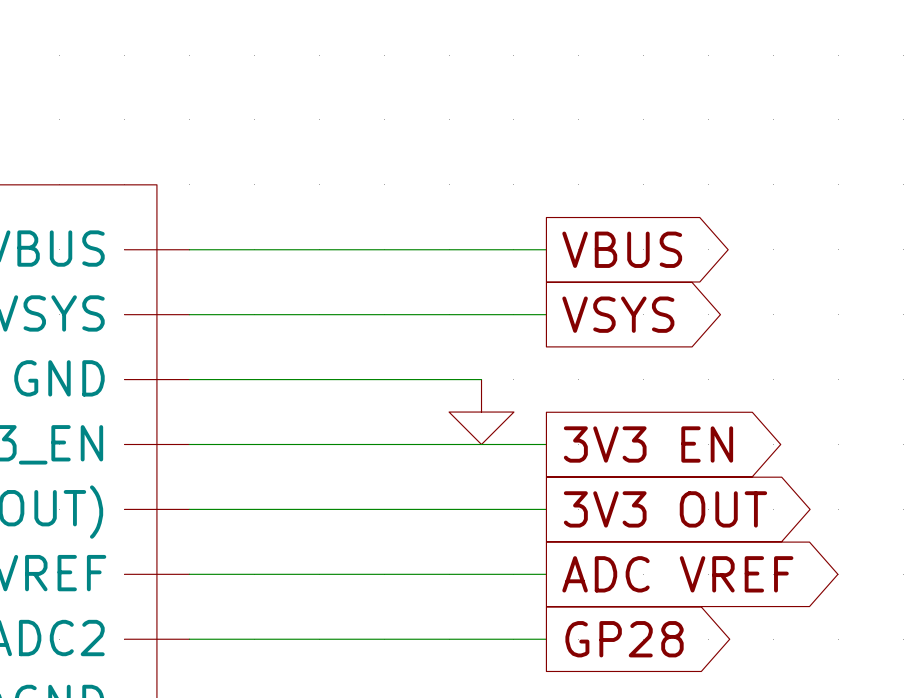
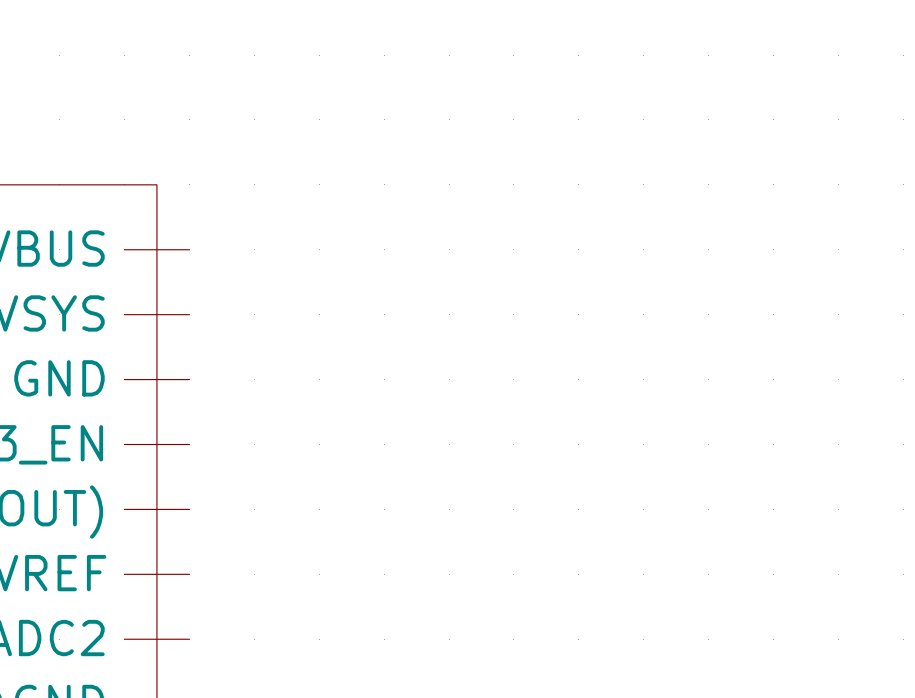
wire: (189, 249) (546, 249) -> none
global label: VBUS (622, 249) -> none
wire: (189, 314) (546, 314) -> none
global label: VSYS (618, 314) -> none
wire: (189, 379) (481, 379) -> none
power symbol: (481, 412) -> none
wire: (189, 444) (546, 444) -> none
global label: 3V3 EN (648, 444) -> none
wire: (189, 509) (546, 509) -> none
global label: 3V3 OUT (665, 509) -> none
wire: (189, 574) (546, 574) -> none
global label: ADC VREF (677, 574) -> none
wire: (189, 639) (546, 639) -> none
global label: GP28 (624, 639) -> none

